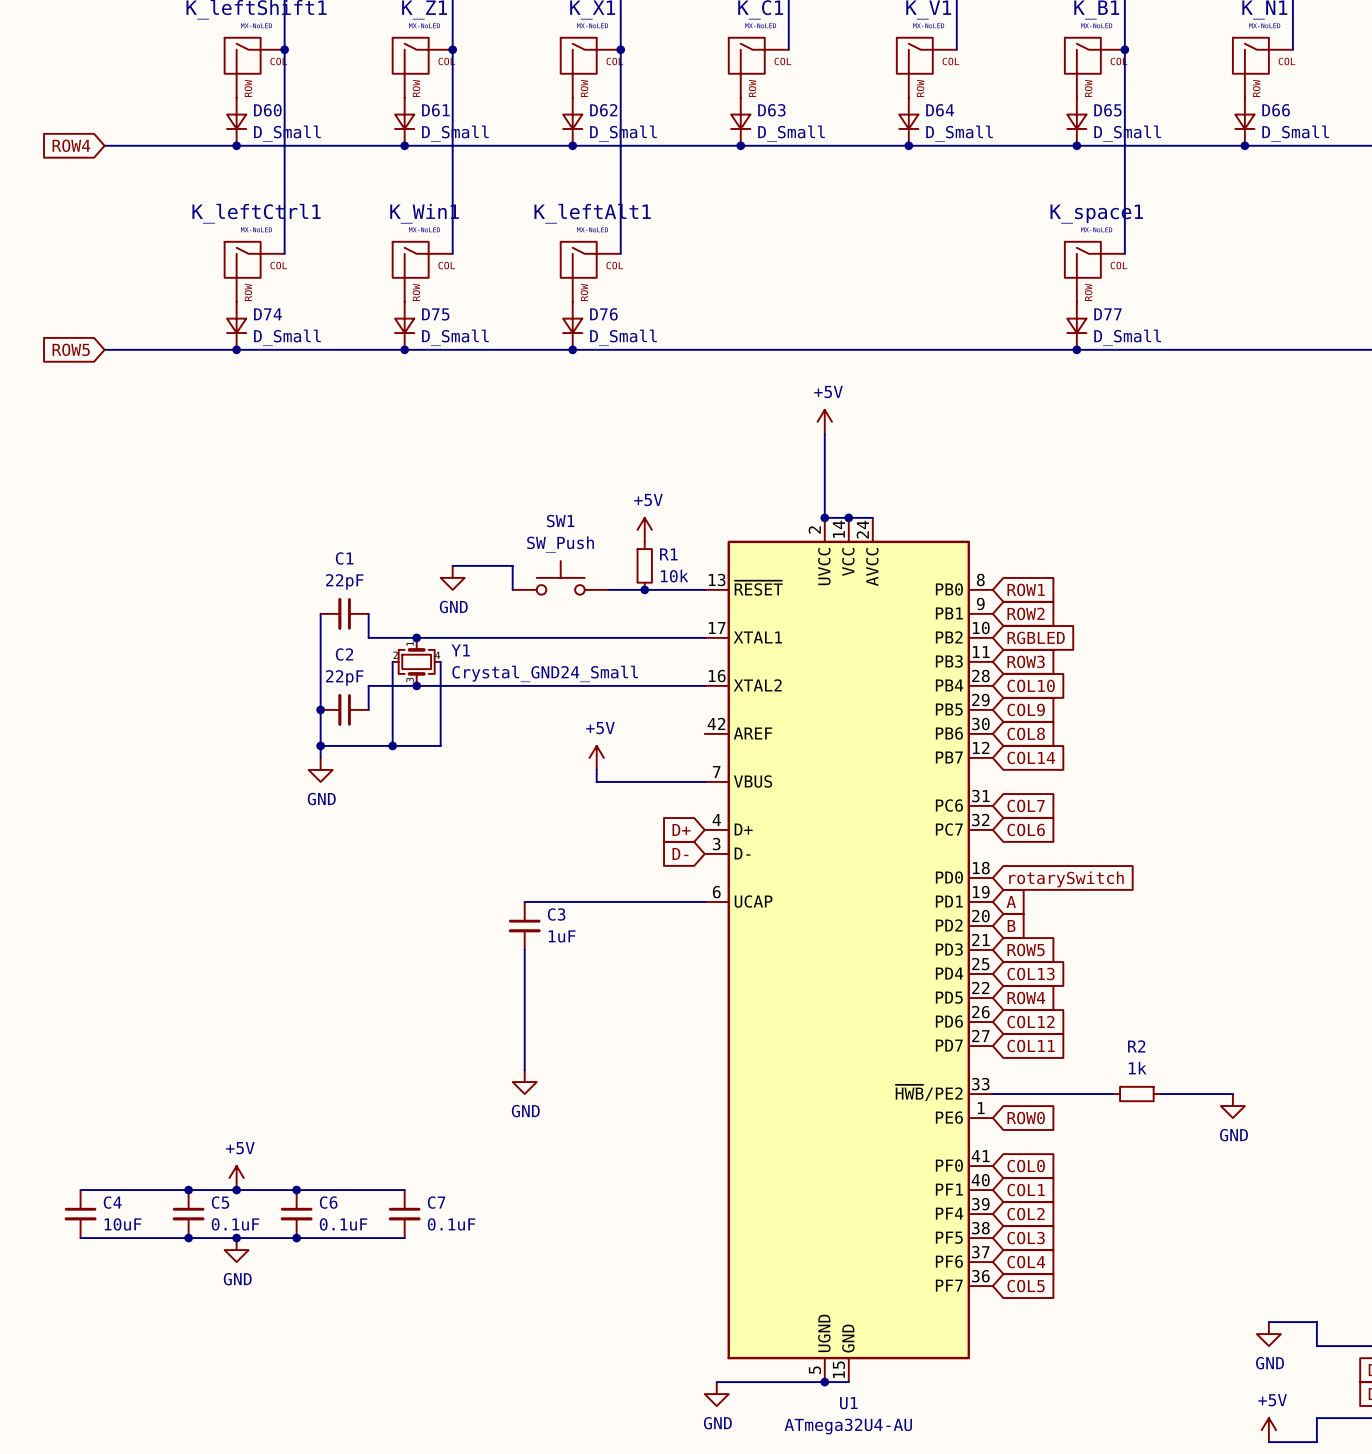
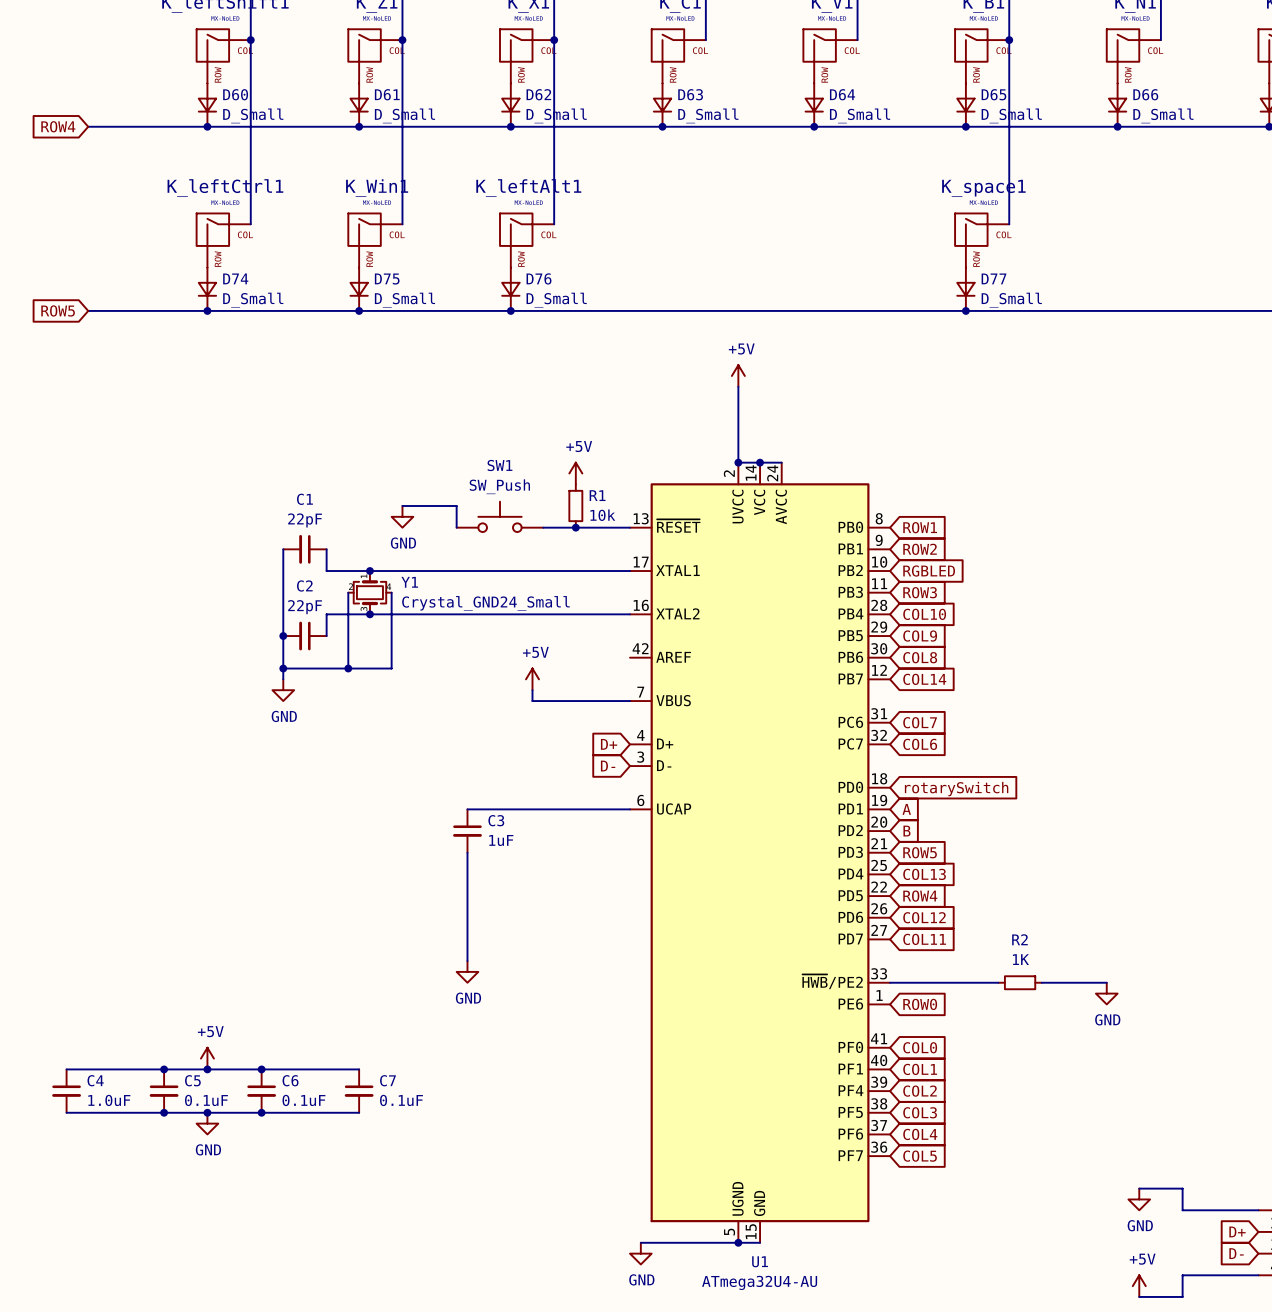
R2 value: 1k (1137, 1068) -> 1K (1020, 959)
C4 value: 10uF (122, 1224) -> 1.0uF (109, 1100)

